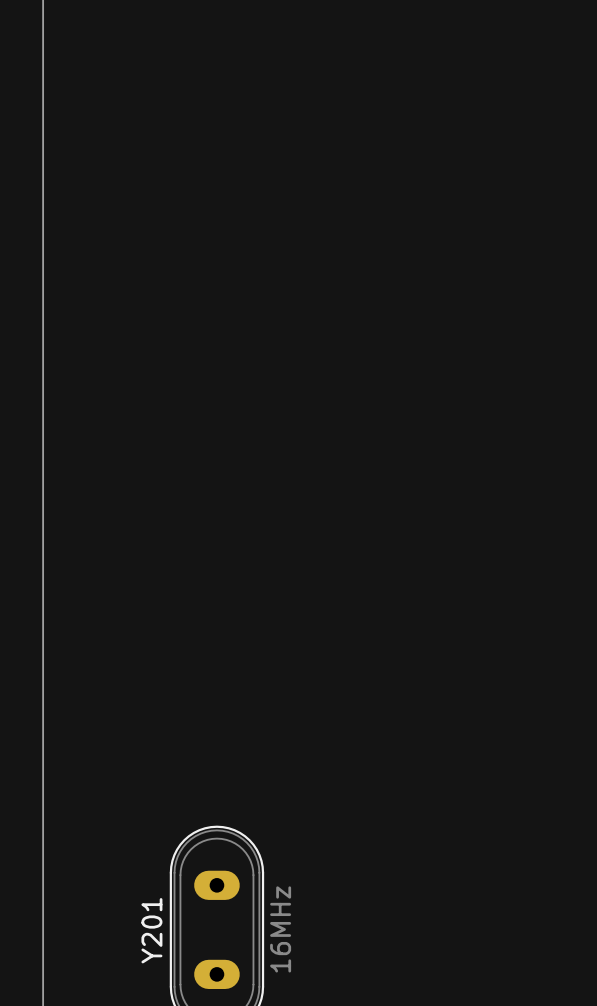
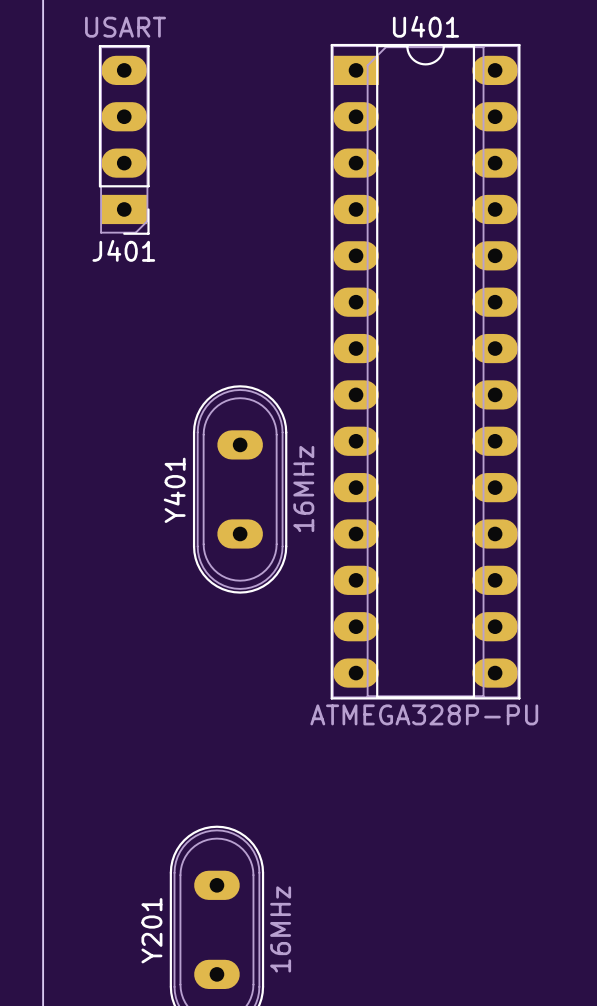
J401: none -> USART (124, 139)
U401: none -> ATMEGA328P-PU (425, 371)
Y401: none -> 16MHz (240, 489)

